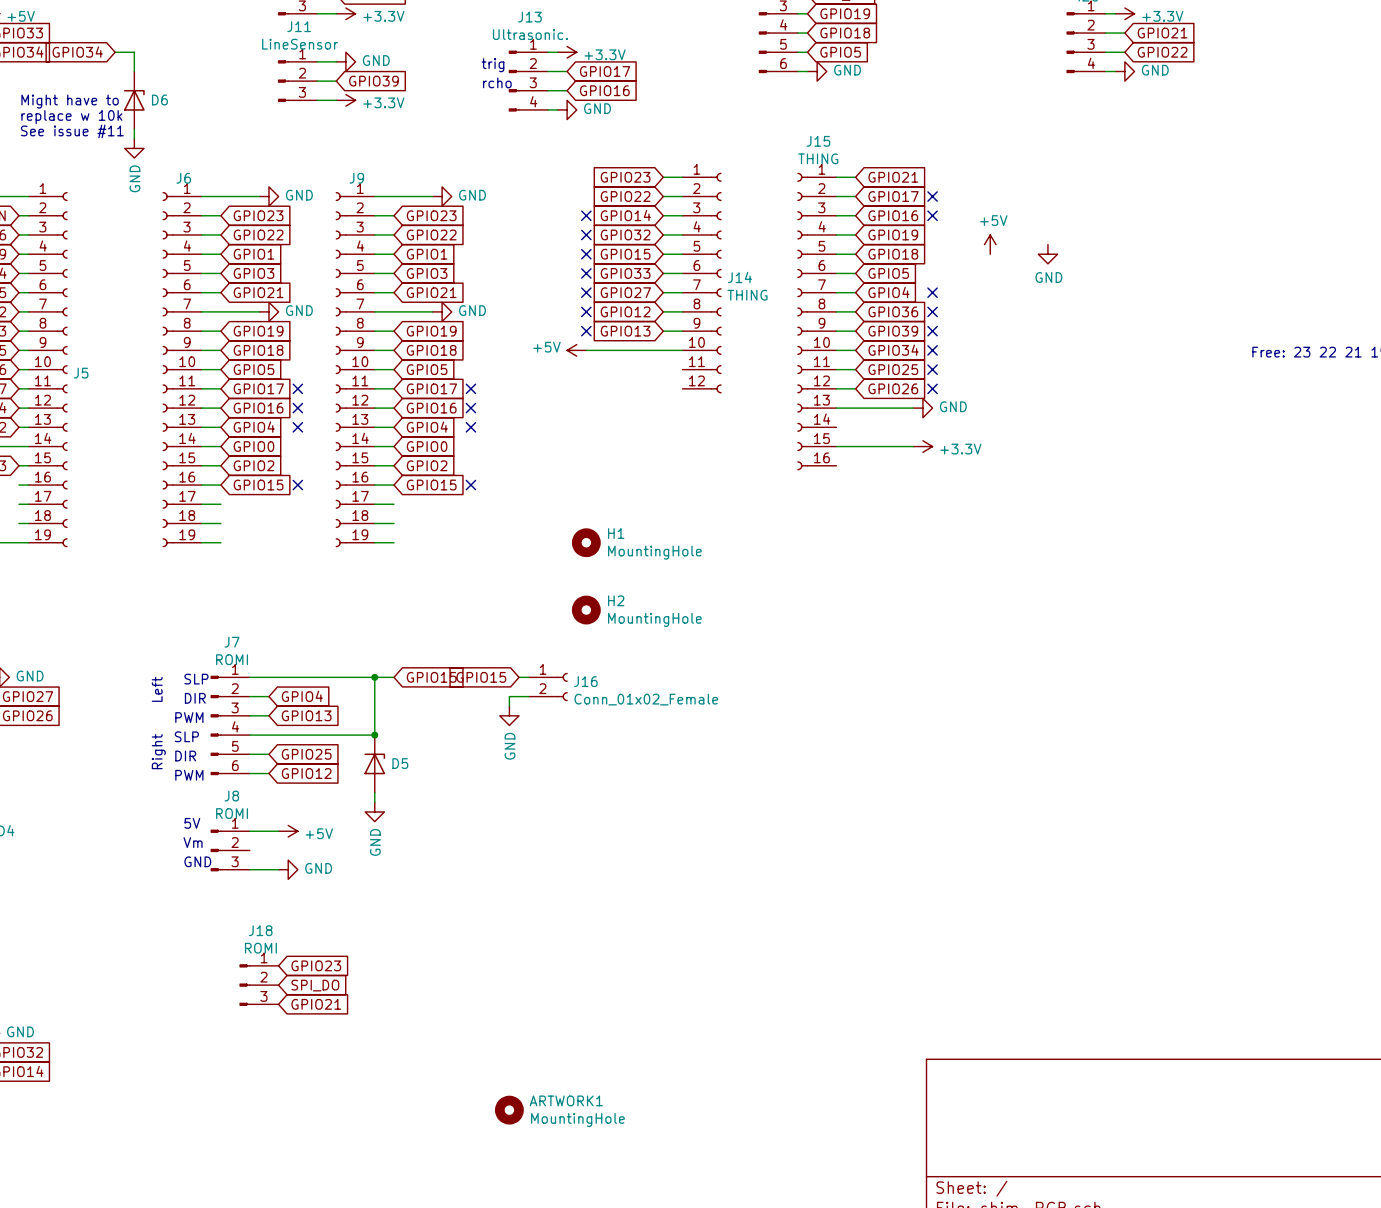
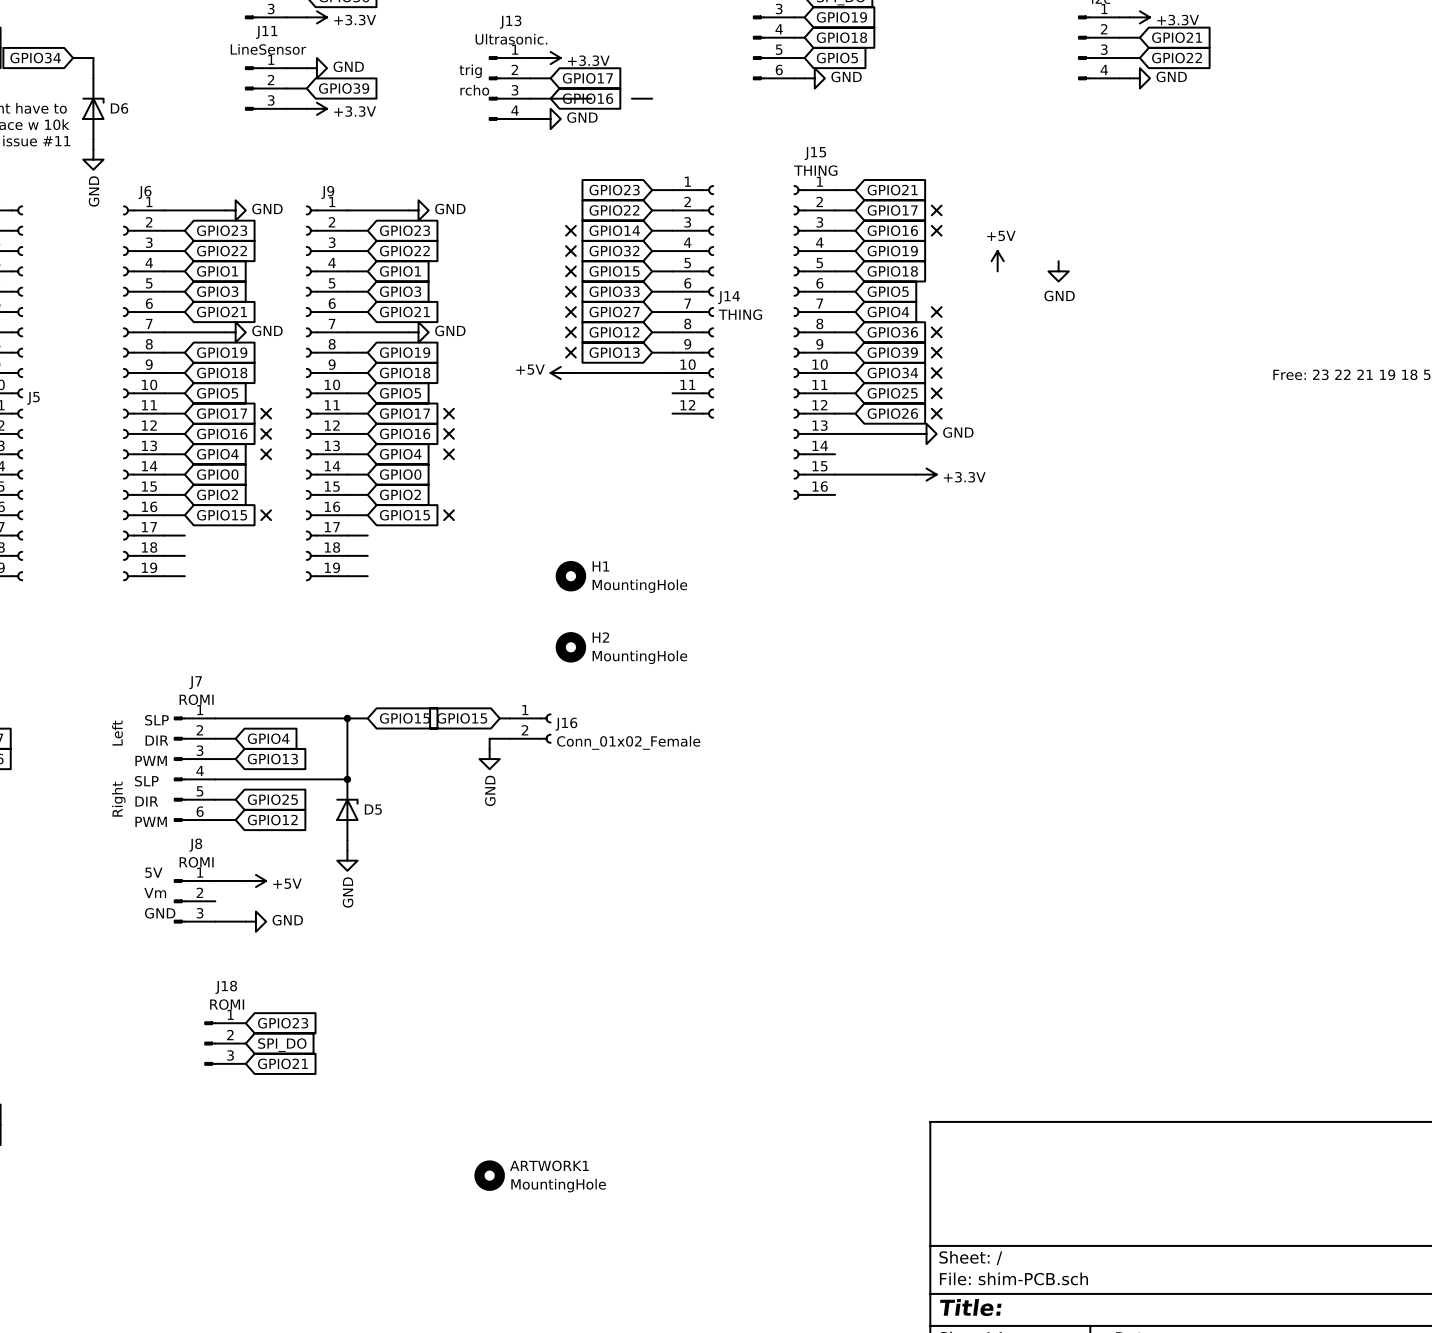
wire: none -> (550, 98) (591, 98)
wire: none -> (631, 98) (652, 98)

